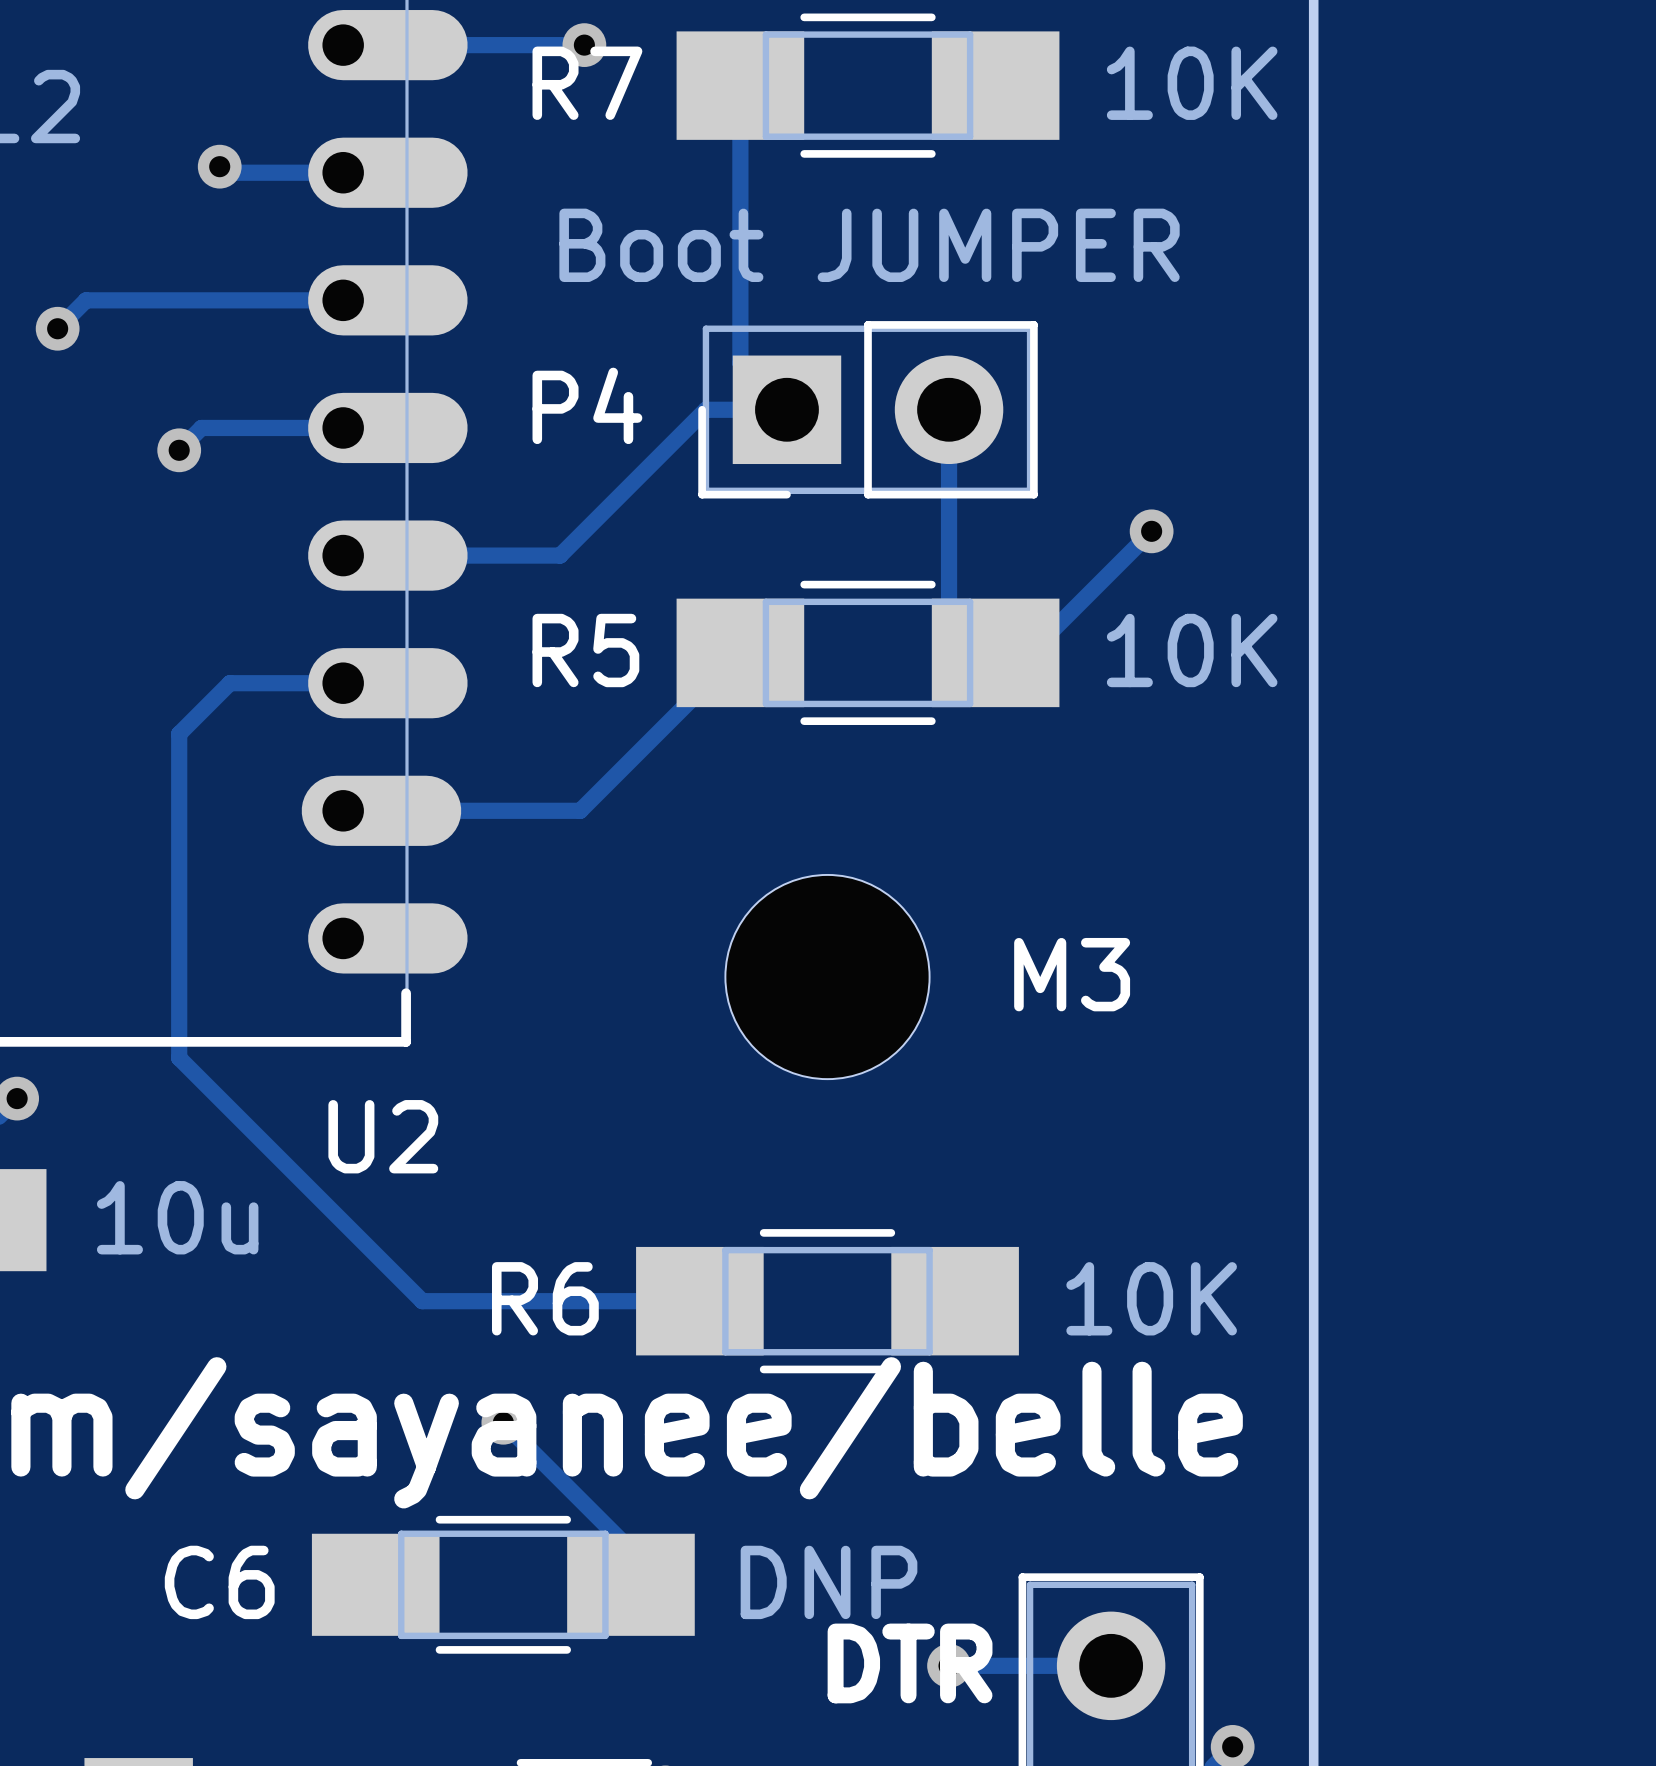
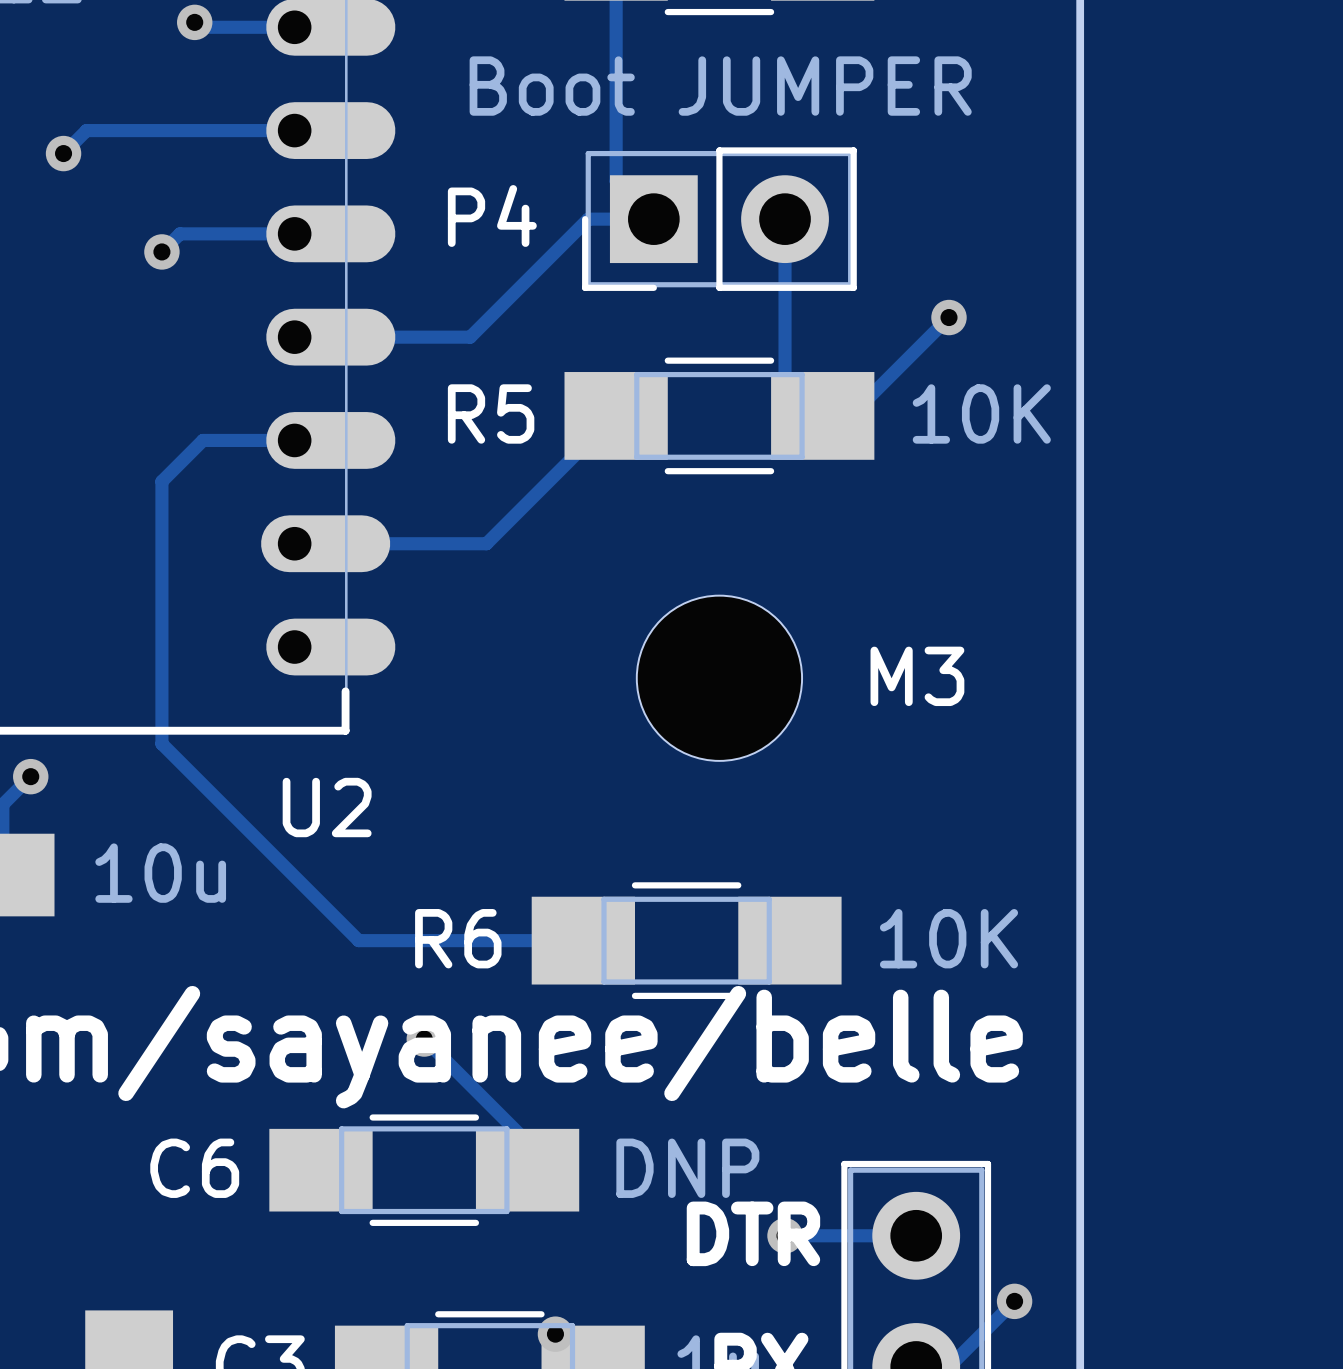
part position: (827, 977) -> (719, 678)

